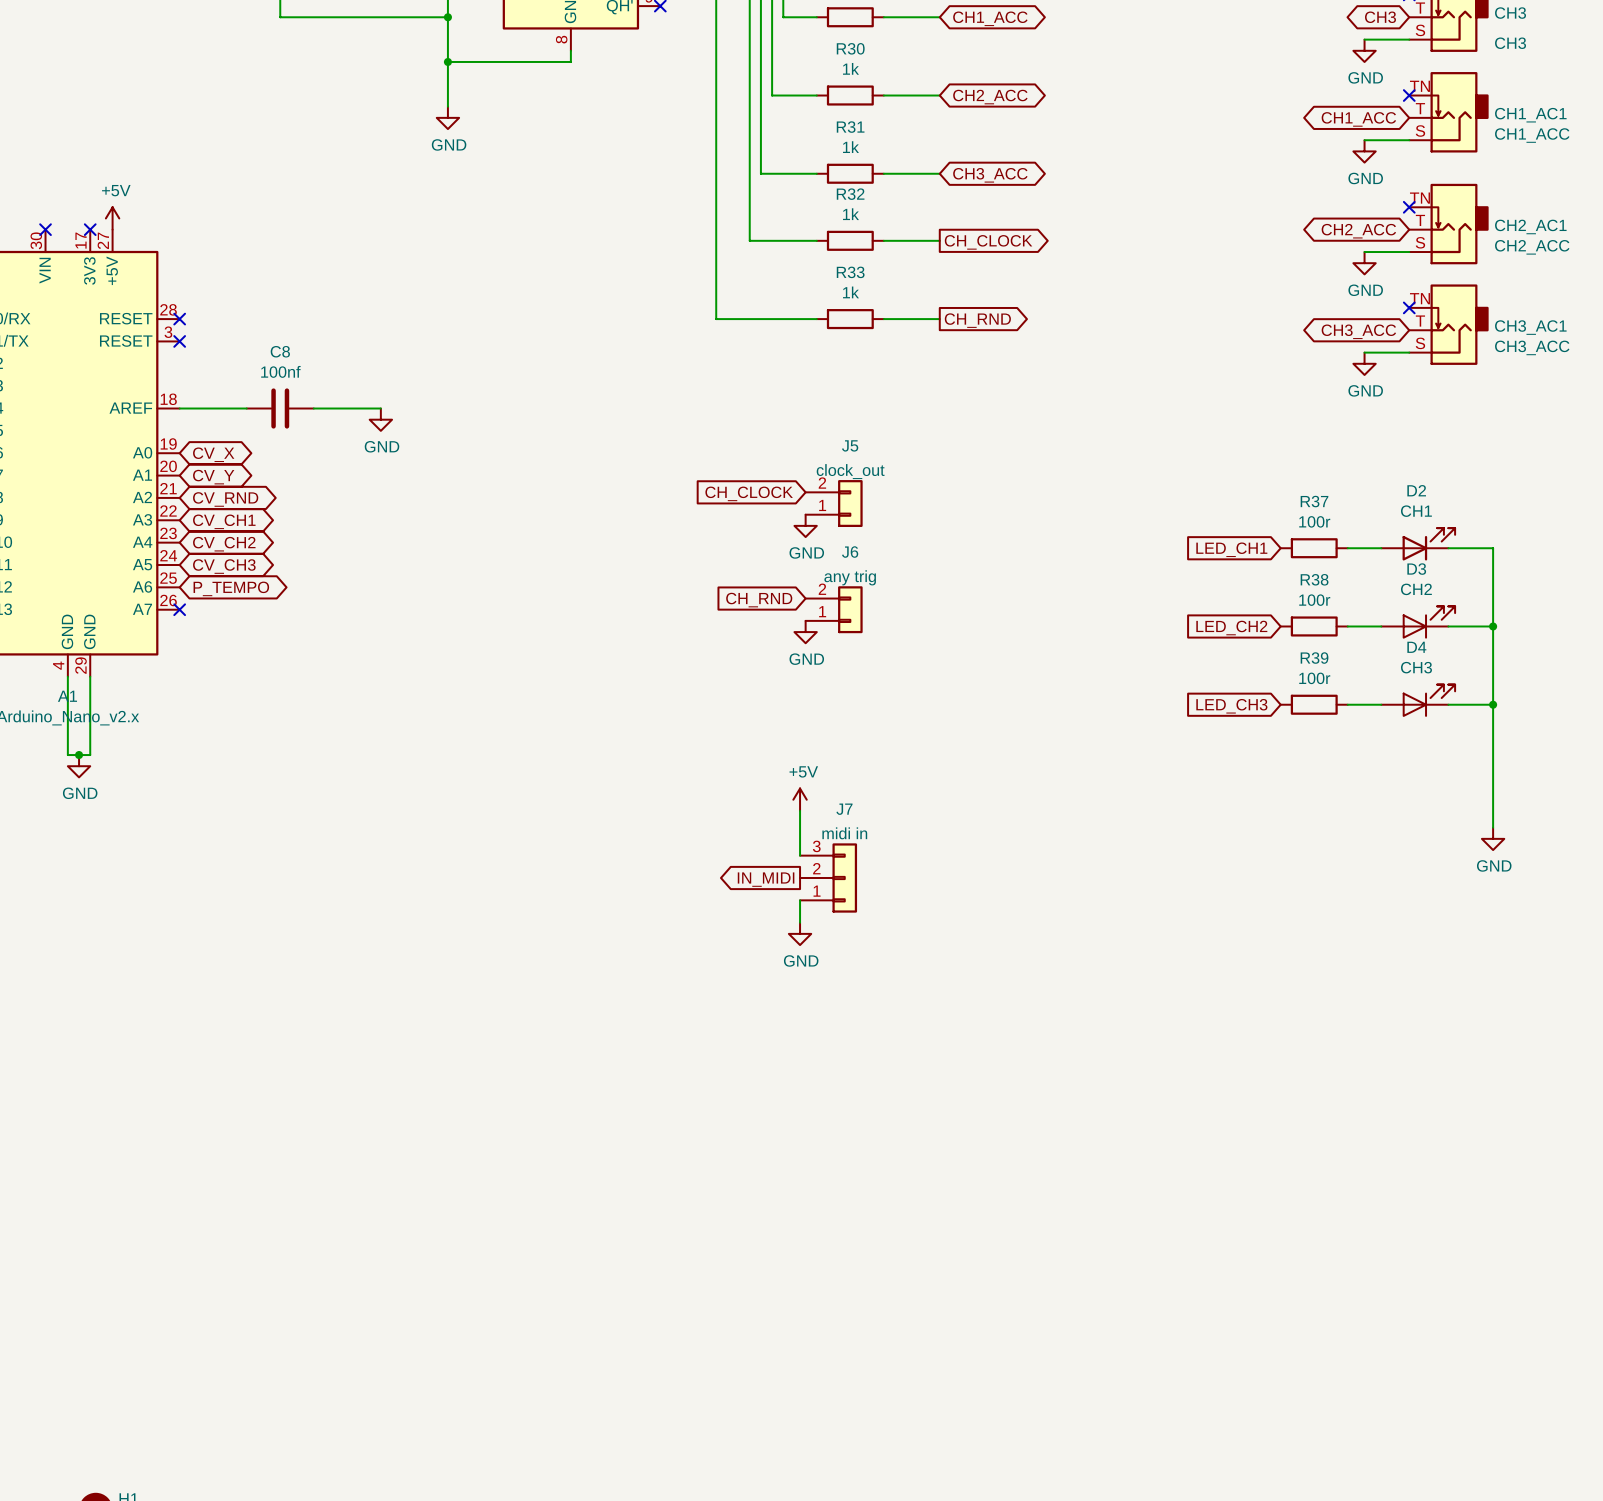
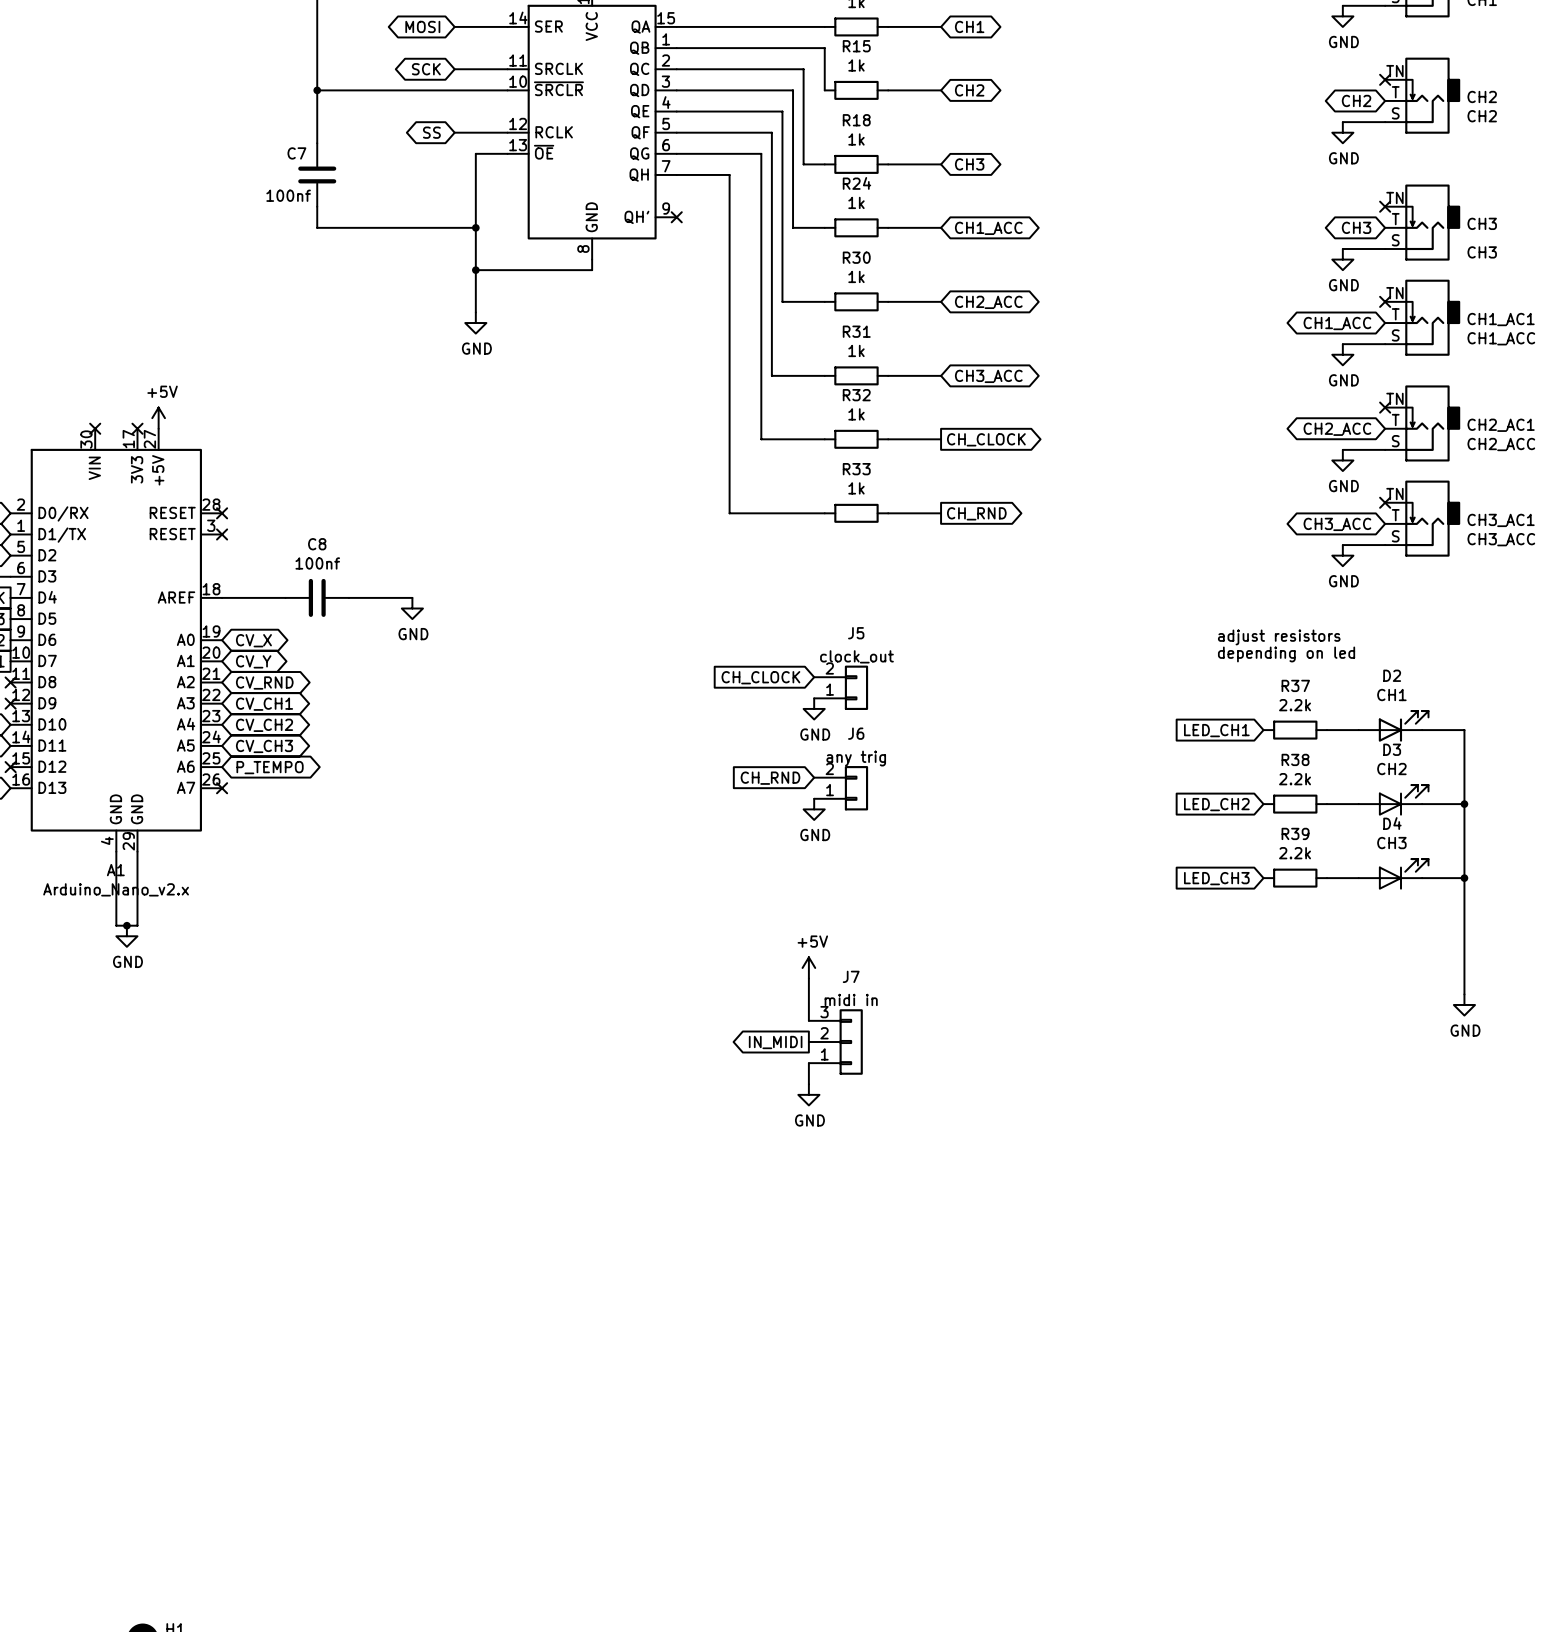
text: none -> adjust resistors (1279, 637)
text: none -> depending on led (1286, 654)
R37 value: 100r (1314, 521) -> 2.2k (1295, 705)
R38 value: 100r (1314, 600) -> 2.2k (1295, 779)
R39 value: 100r (1314, 678) -> 2.2k (1295, 853)

